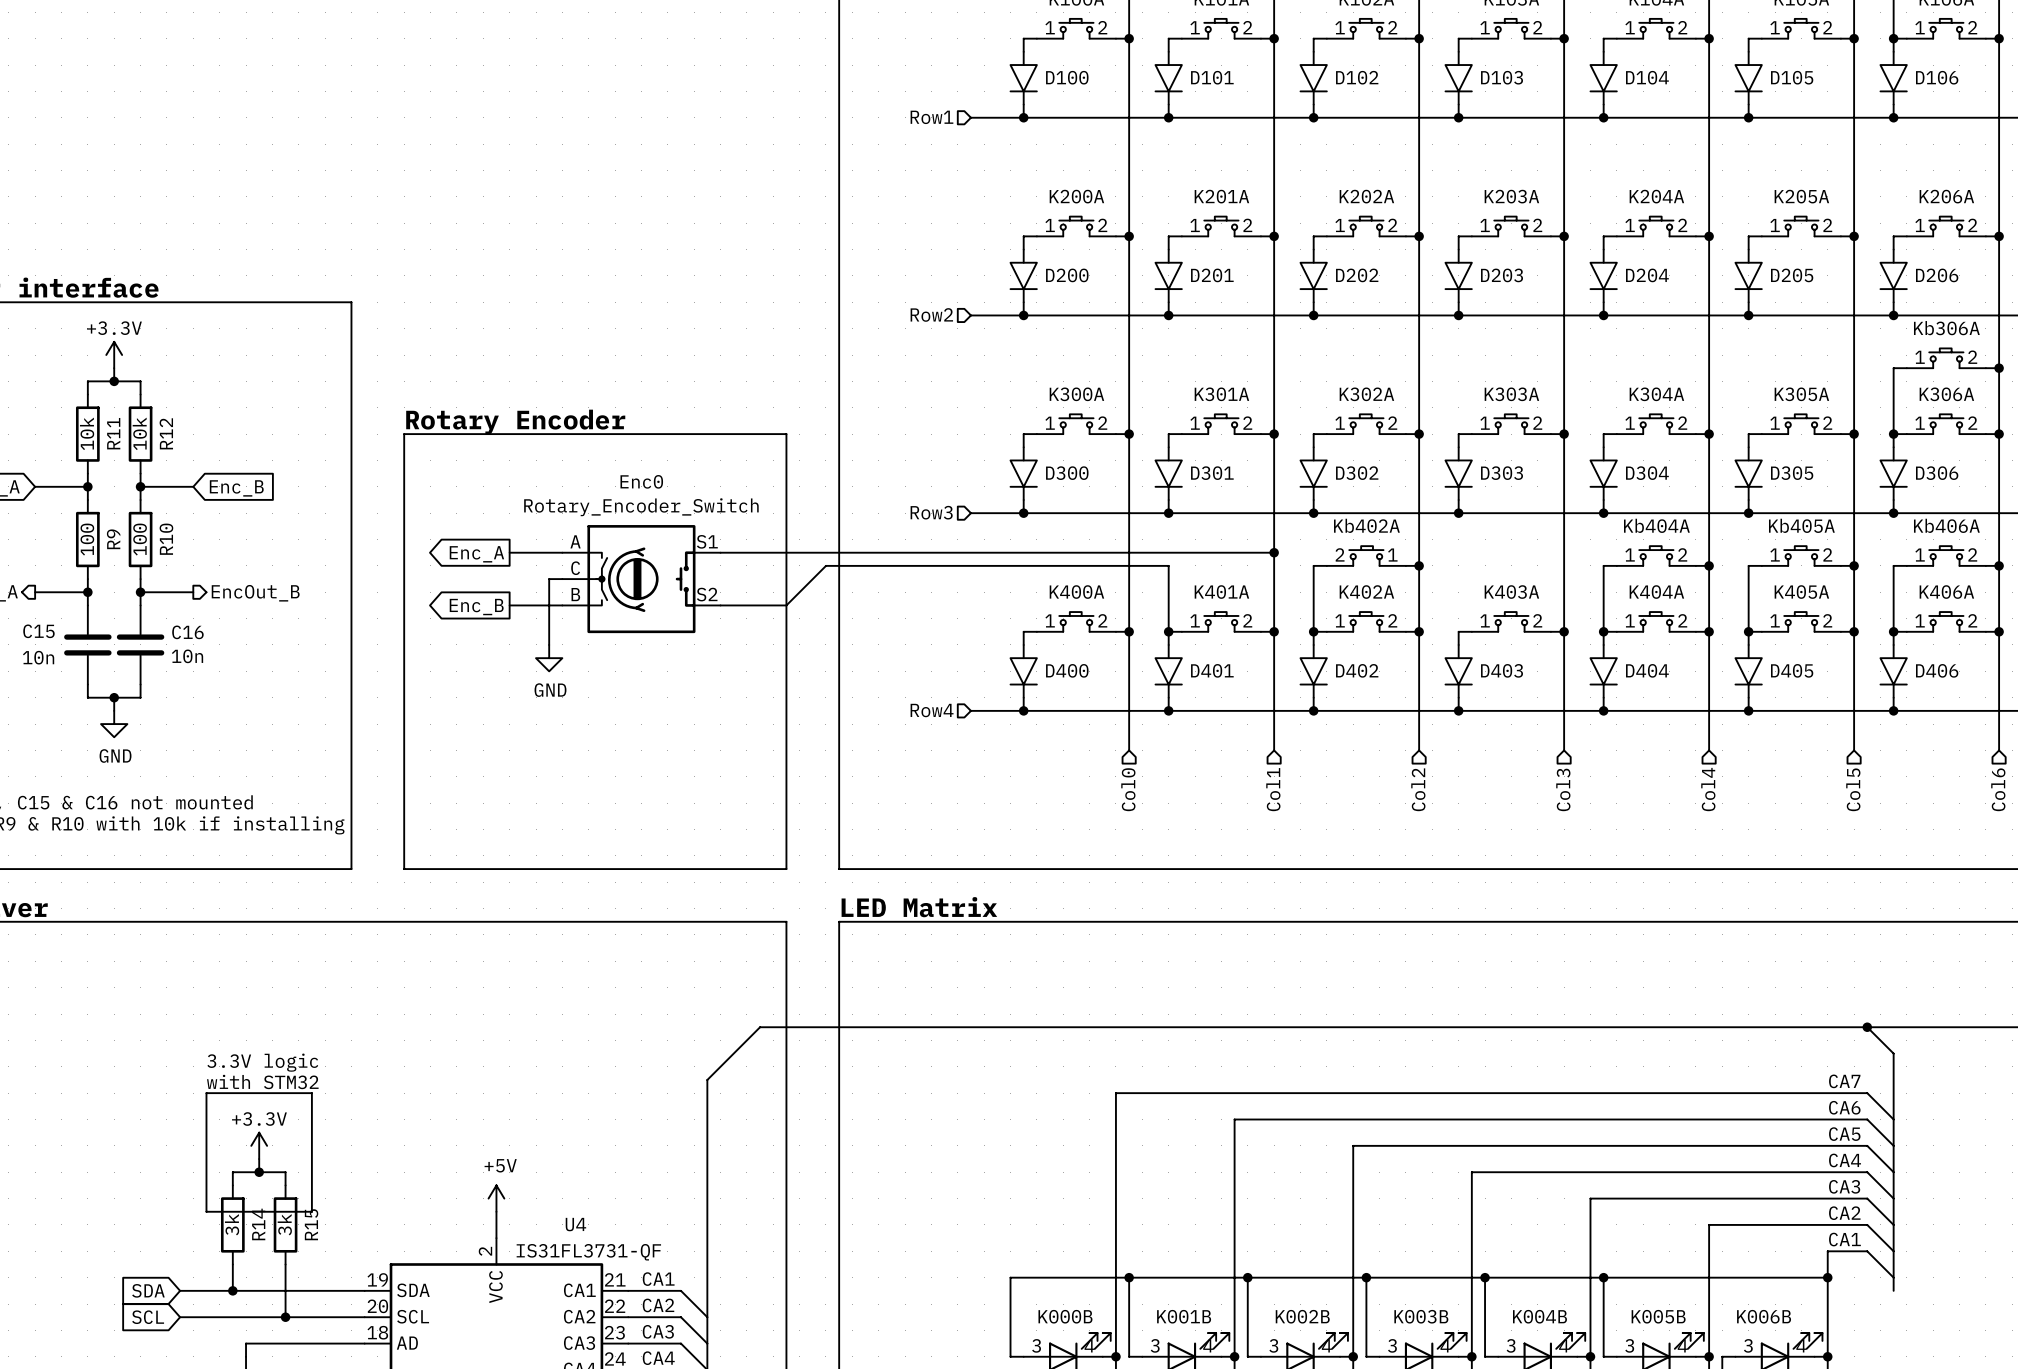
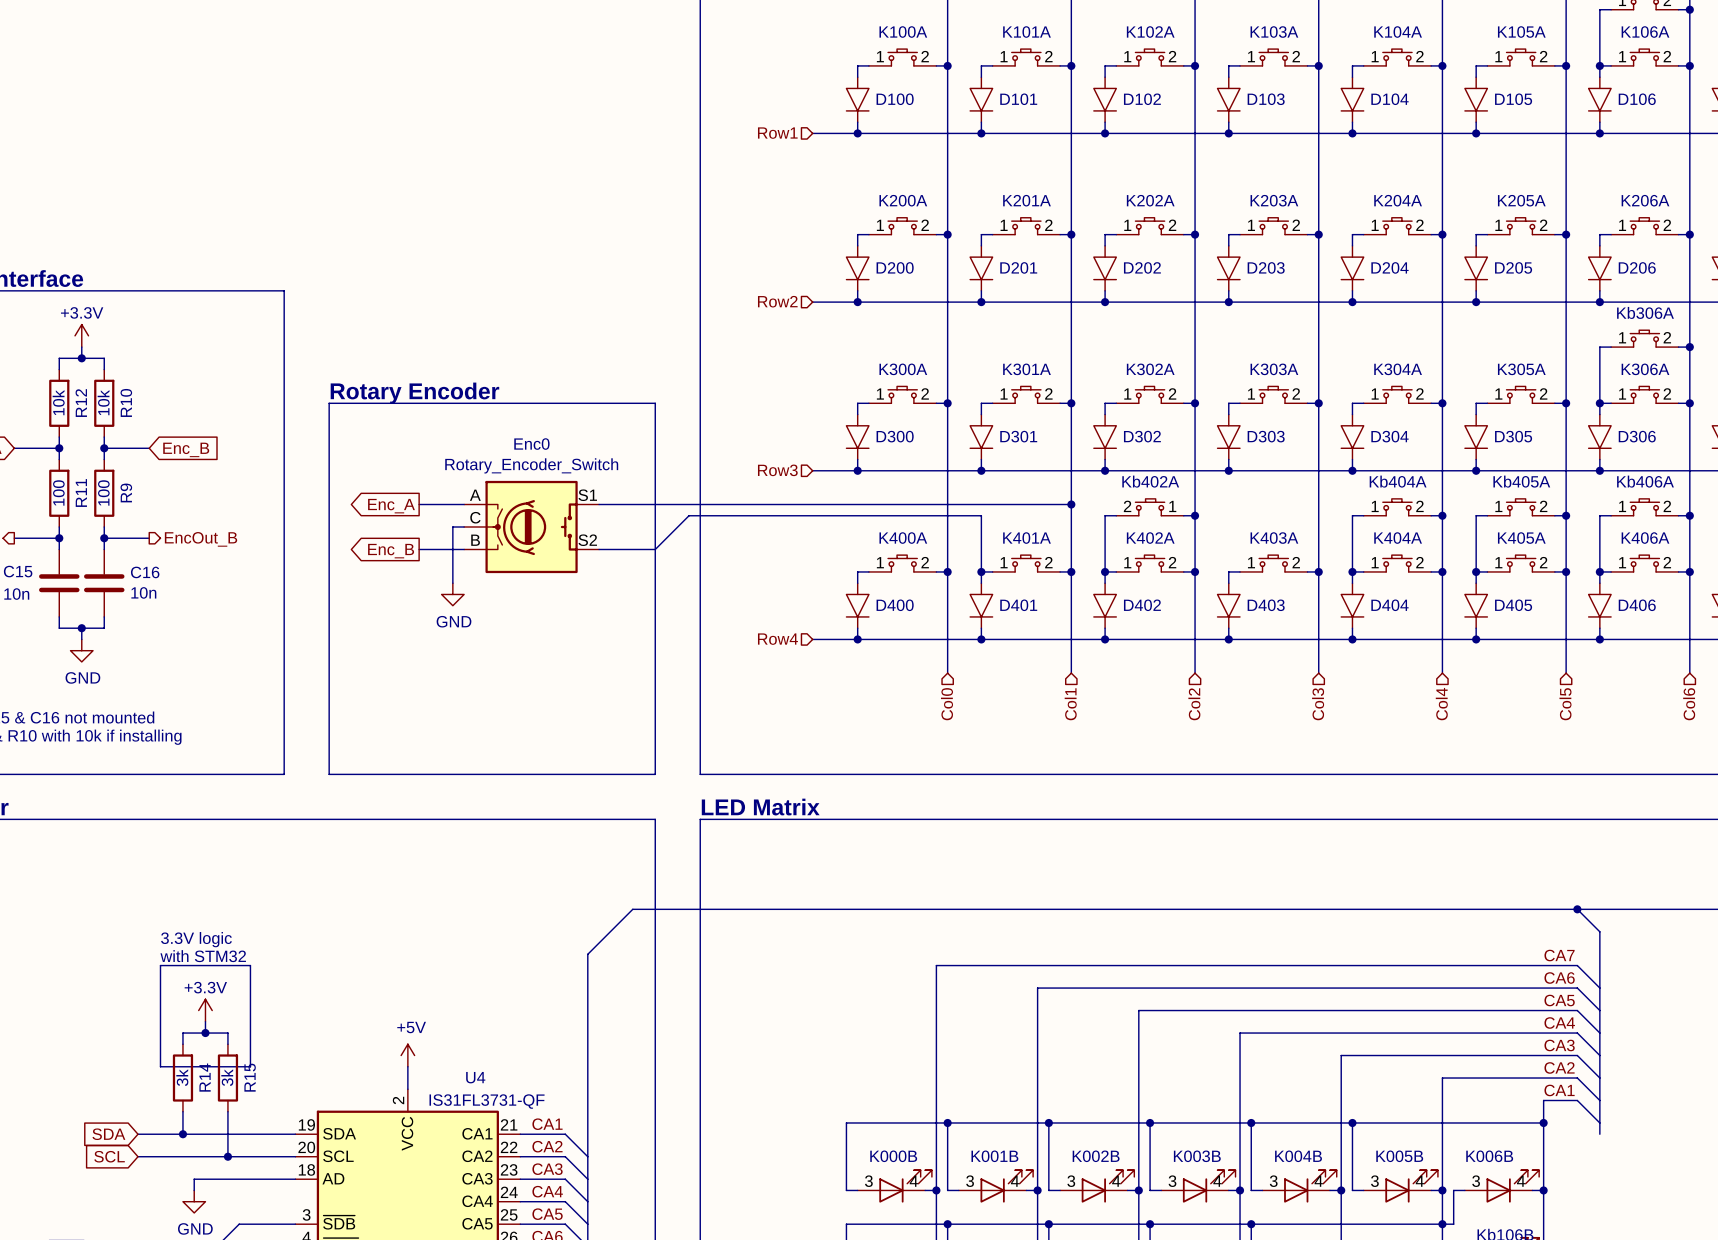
R11 name: R11 (113, 433) -> R12 (81, 403)
R12 name: R12 (166, 433) -> R10 (126, 402)
R9 name: R9 (113, 539) -> R11 (81, 492)
R10 name: R10 (166, 539) -> R9 (126, 492)

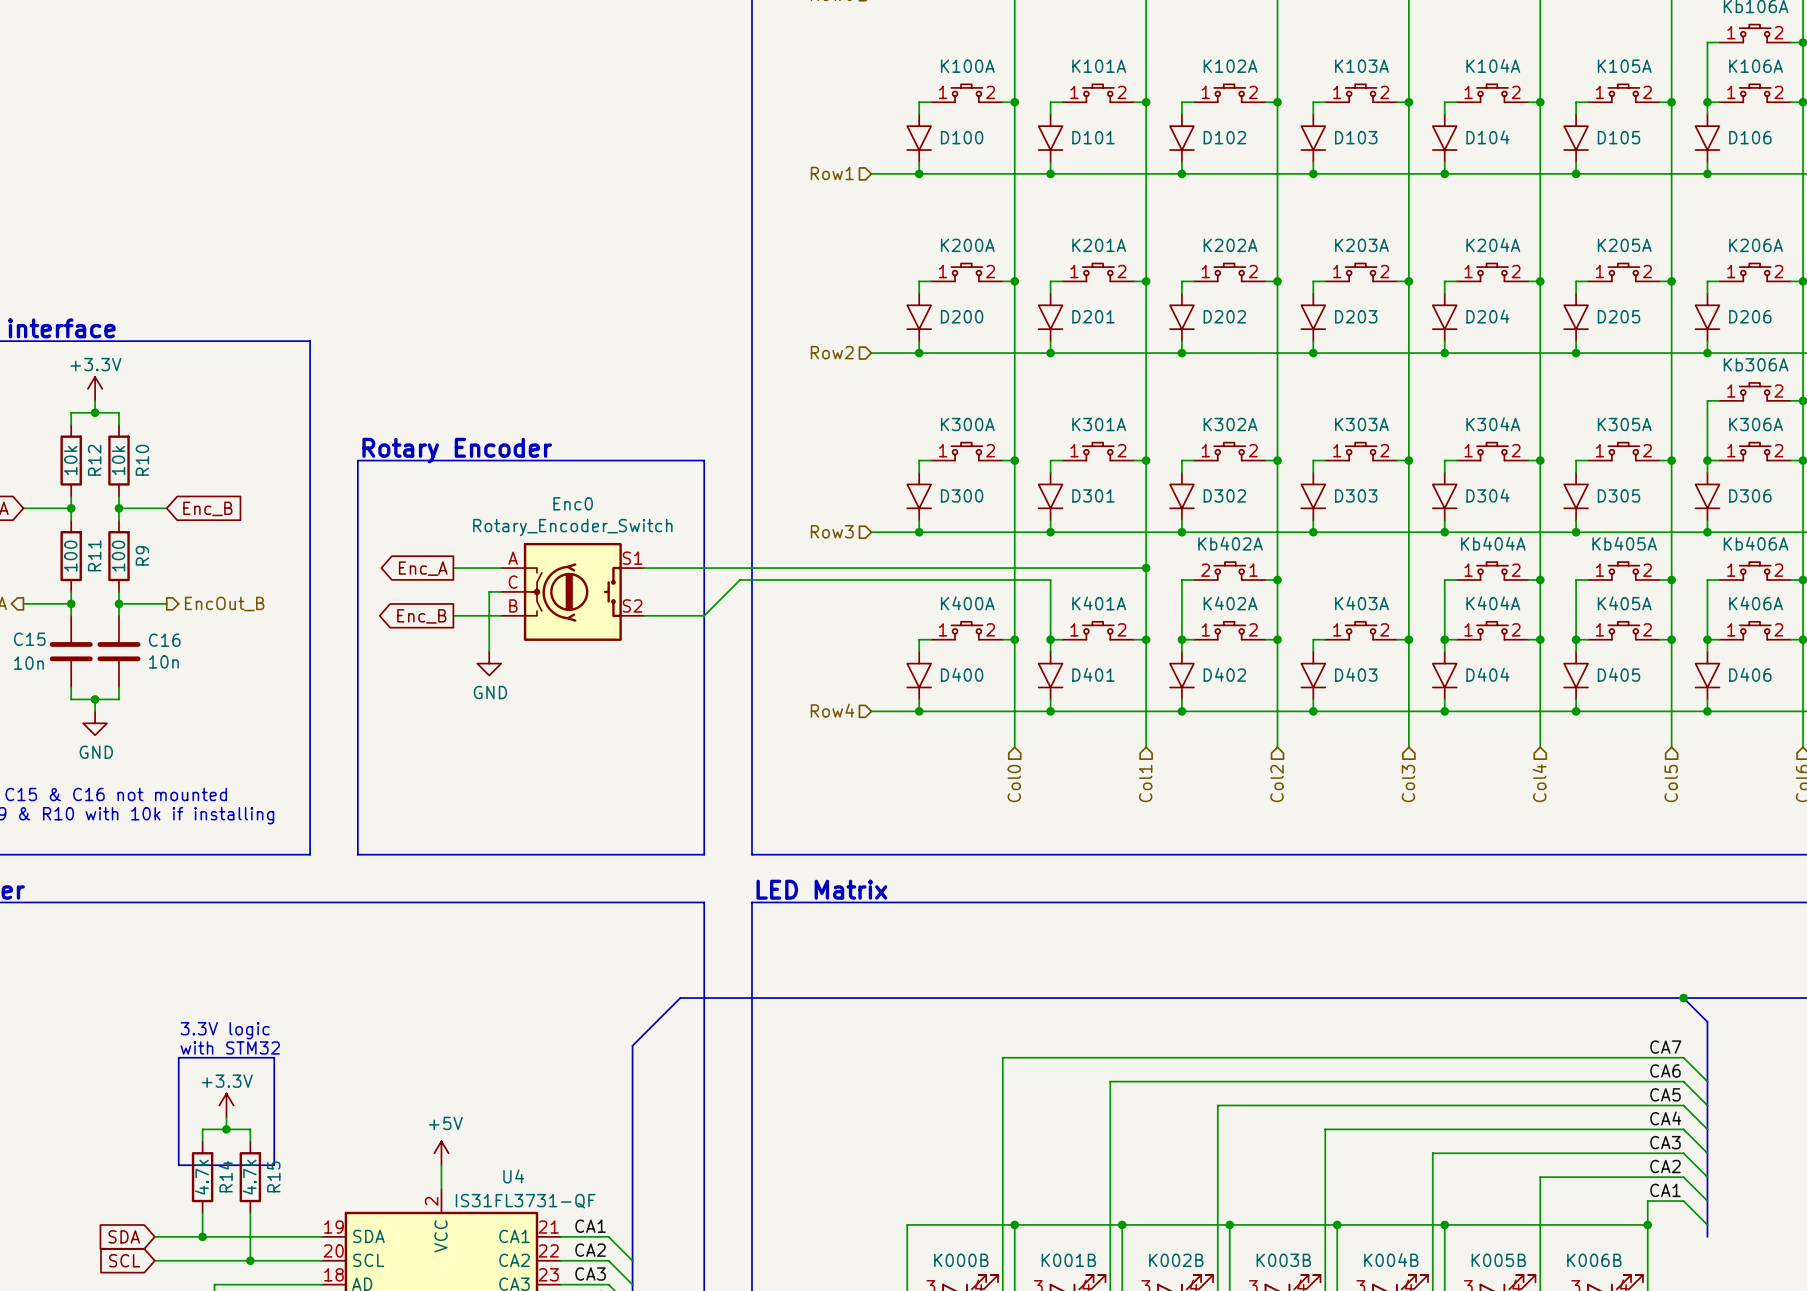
R14 value: 3k (182, 1077) -> 4.7k (201, 1177)
R15 value: 3k (227, 1077) -> 4.7k (249, 1177)

